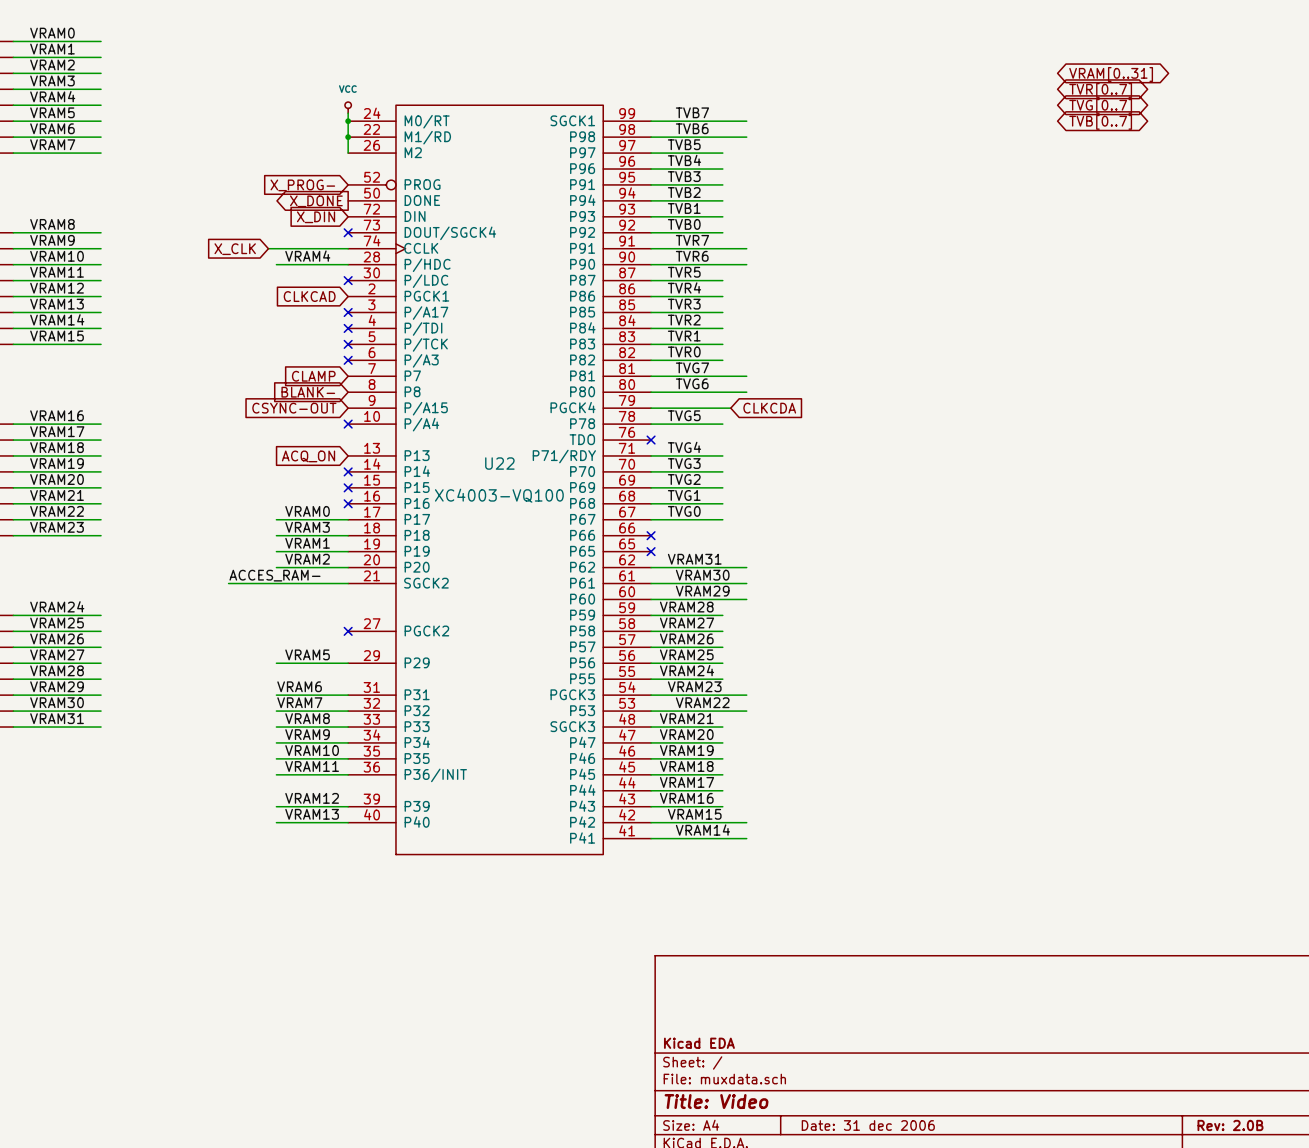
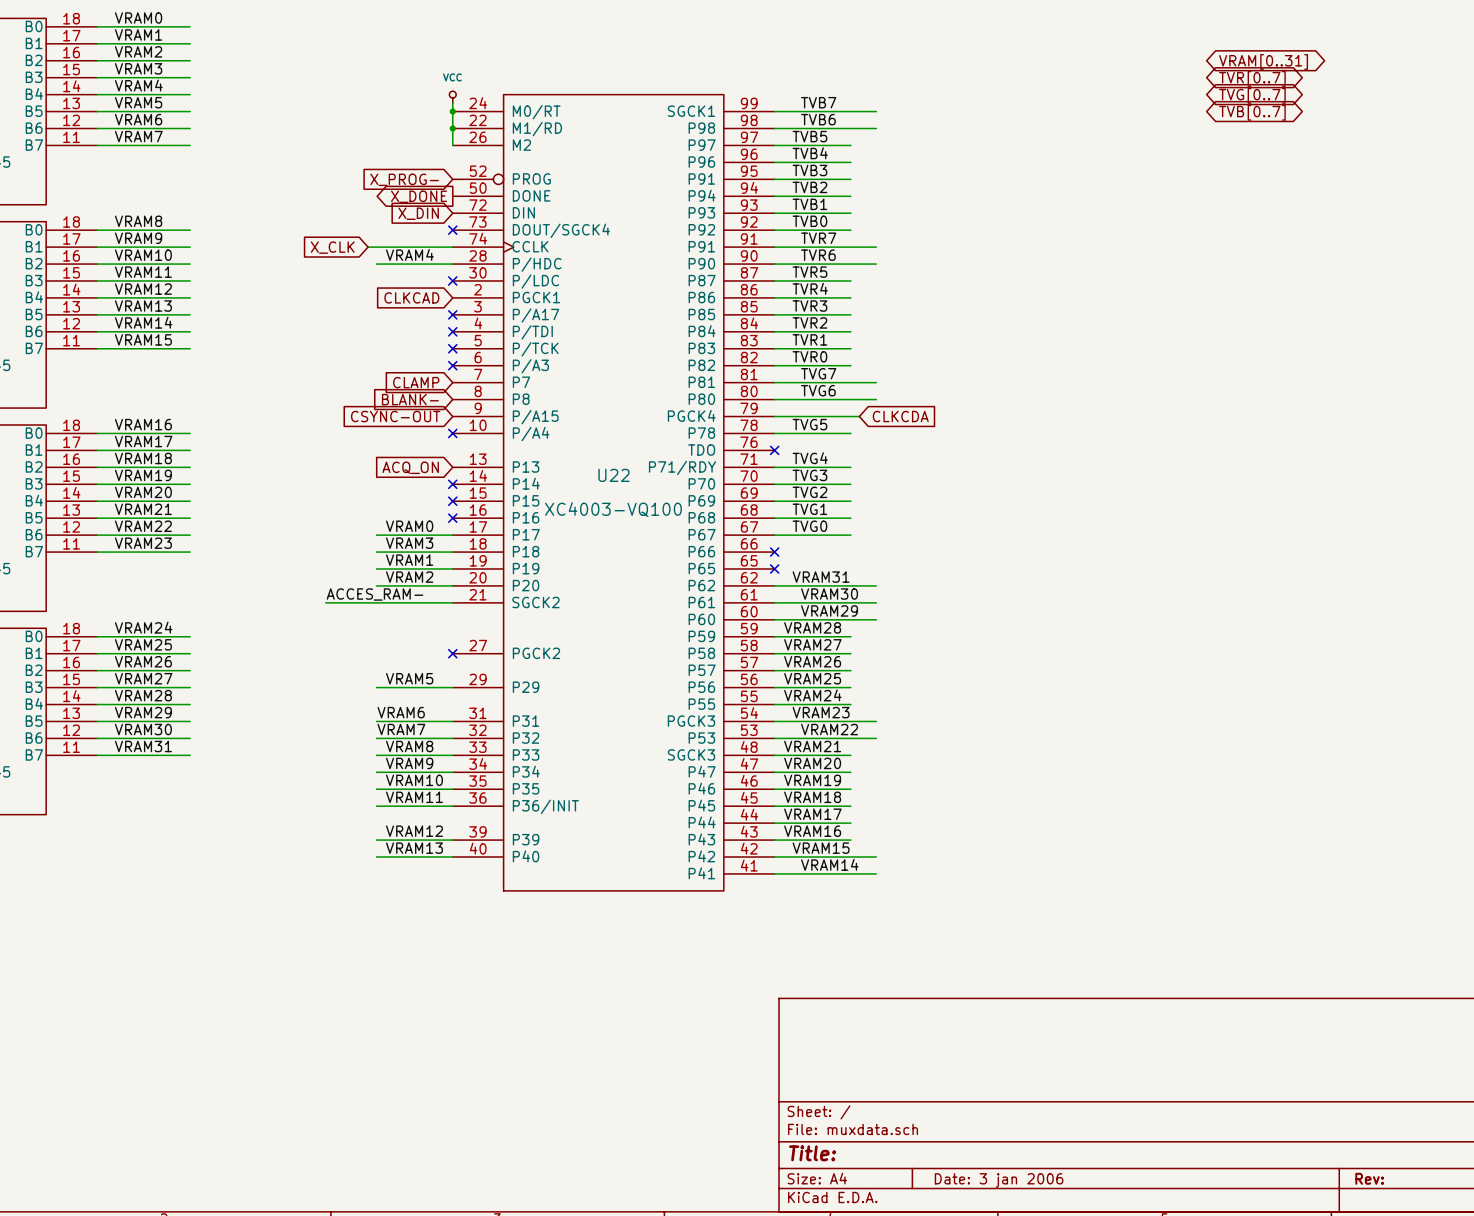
title block: Kicad EDA (699, 1043) -> none
title block: Title: Video (716, 1101) -> Title: (812, 1153)
title block: Date: 31 dec 2006 (868, 1125) -> Date: 3 jan 2006 (999, 1180)
title block: Rev: 2.0B (1230, 1125) -> Rev: (1369, 1178)

